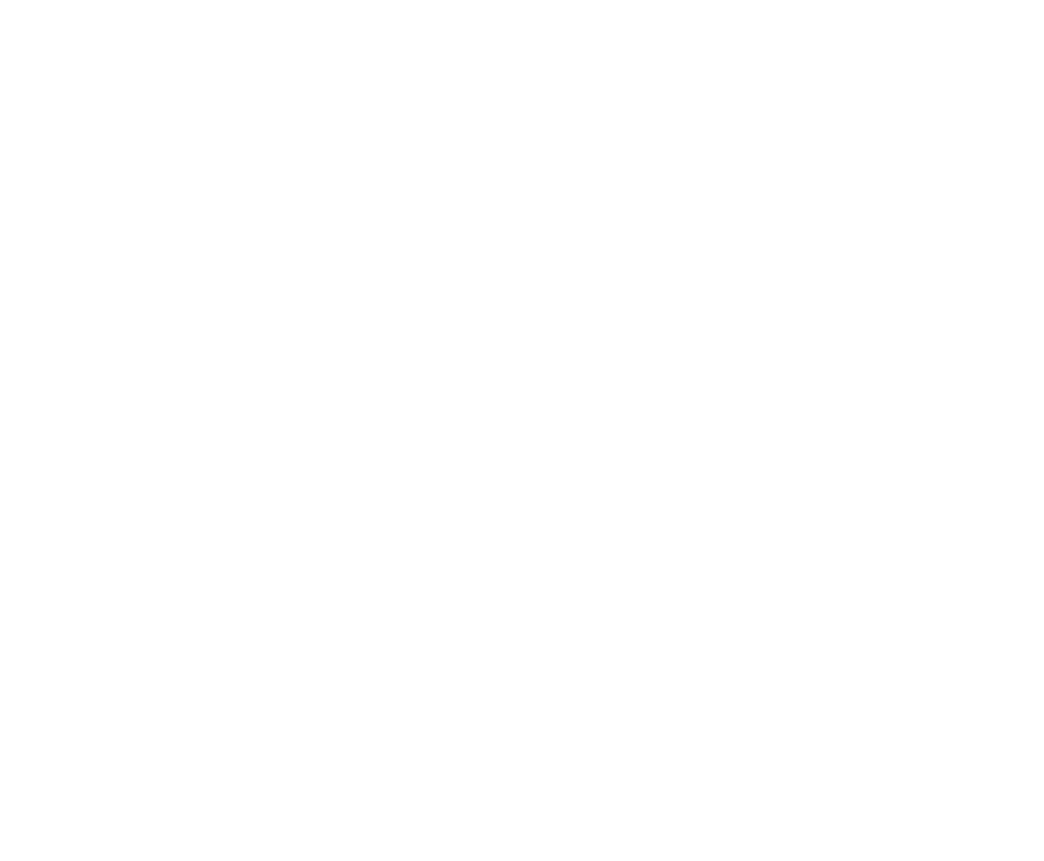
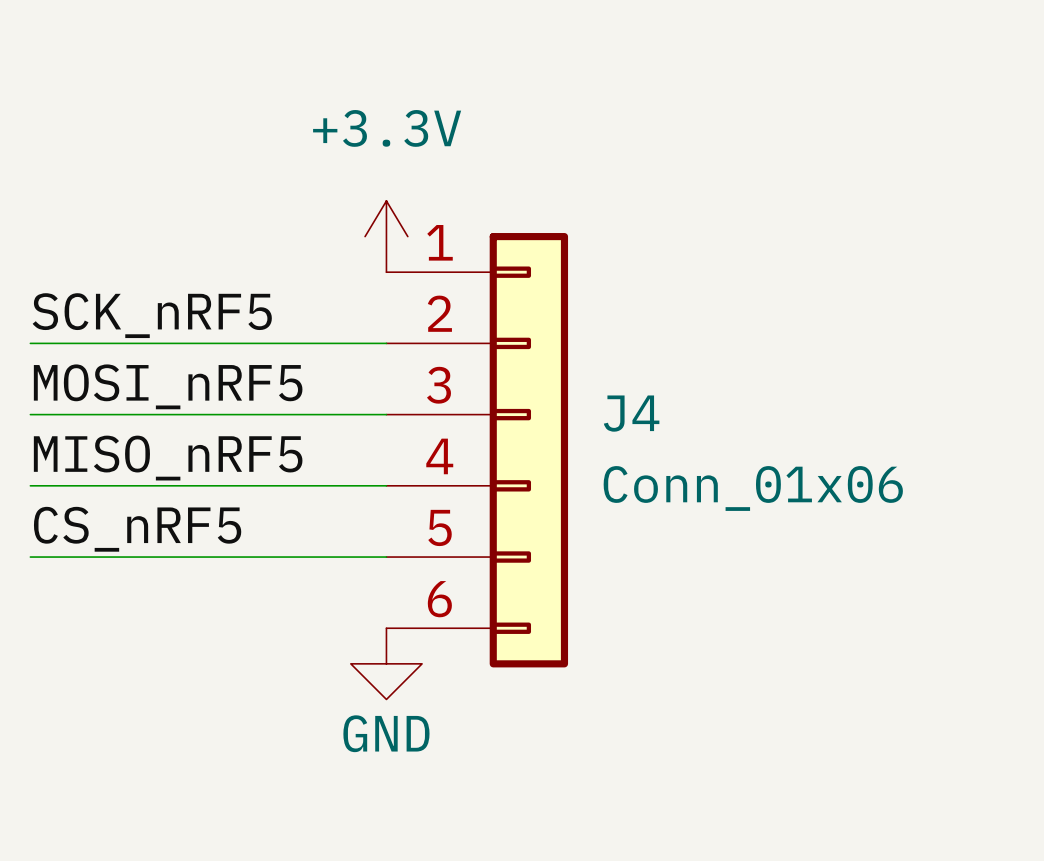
power symbol: none -> +3.3V (386, 236)
label: none -> SCK_nRF5 (152, 315)
wire: none -> (30, 343) (386, 343)
label: none -> MOSI_nRF5 (168, 386)
wire: none -> (30, 414) (386, 414)
J4: none -> Conn_01x06 (477, 450)
label: none -> MISO_nRF5 (168, 458)
wire: none -> (30, 485) (386, 485)
label: none -> CS_nRF5 (137, 529)
wire: none -> (30, 557) (386, 557)
power symbol: none -> GND (386, 663)

